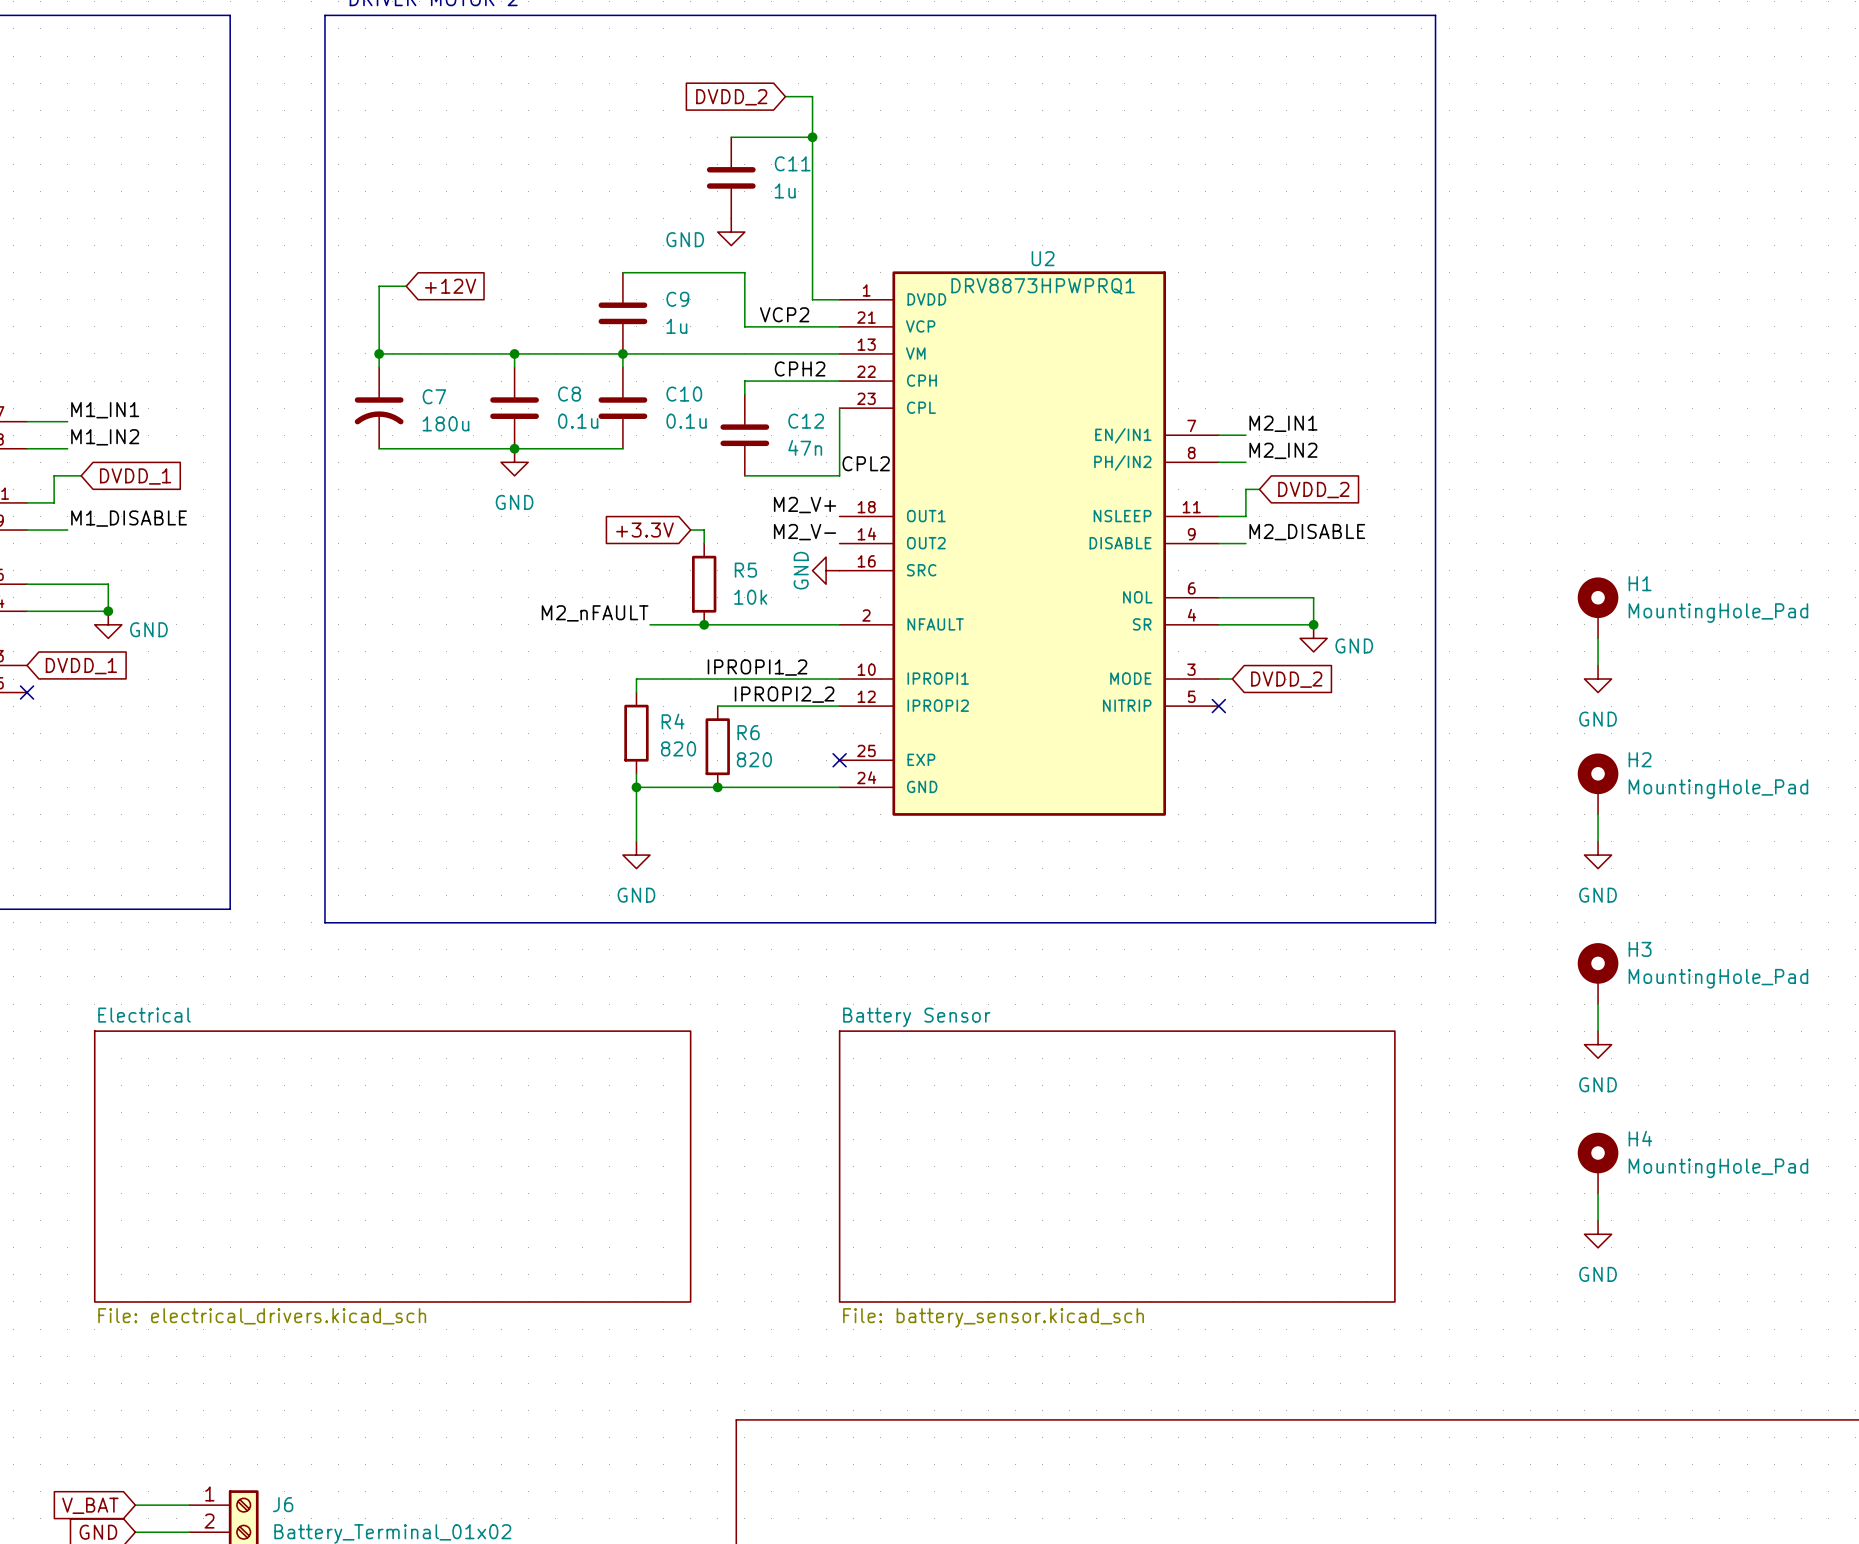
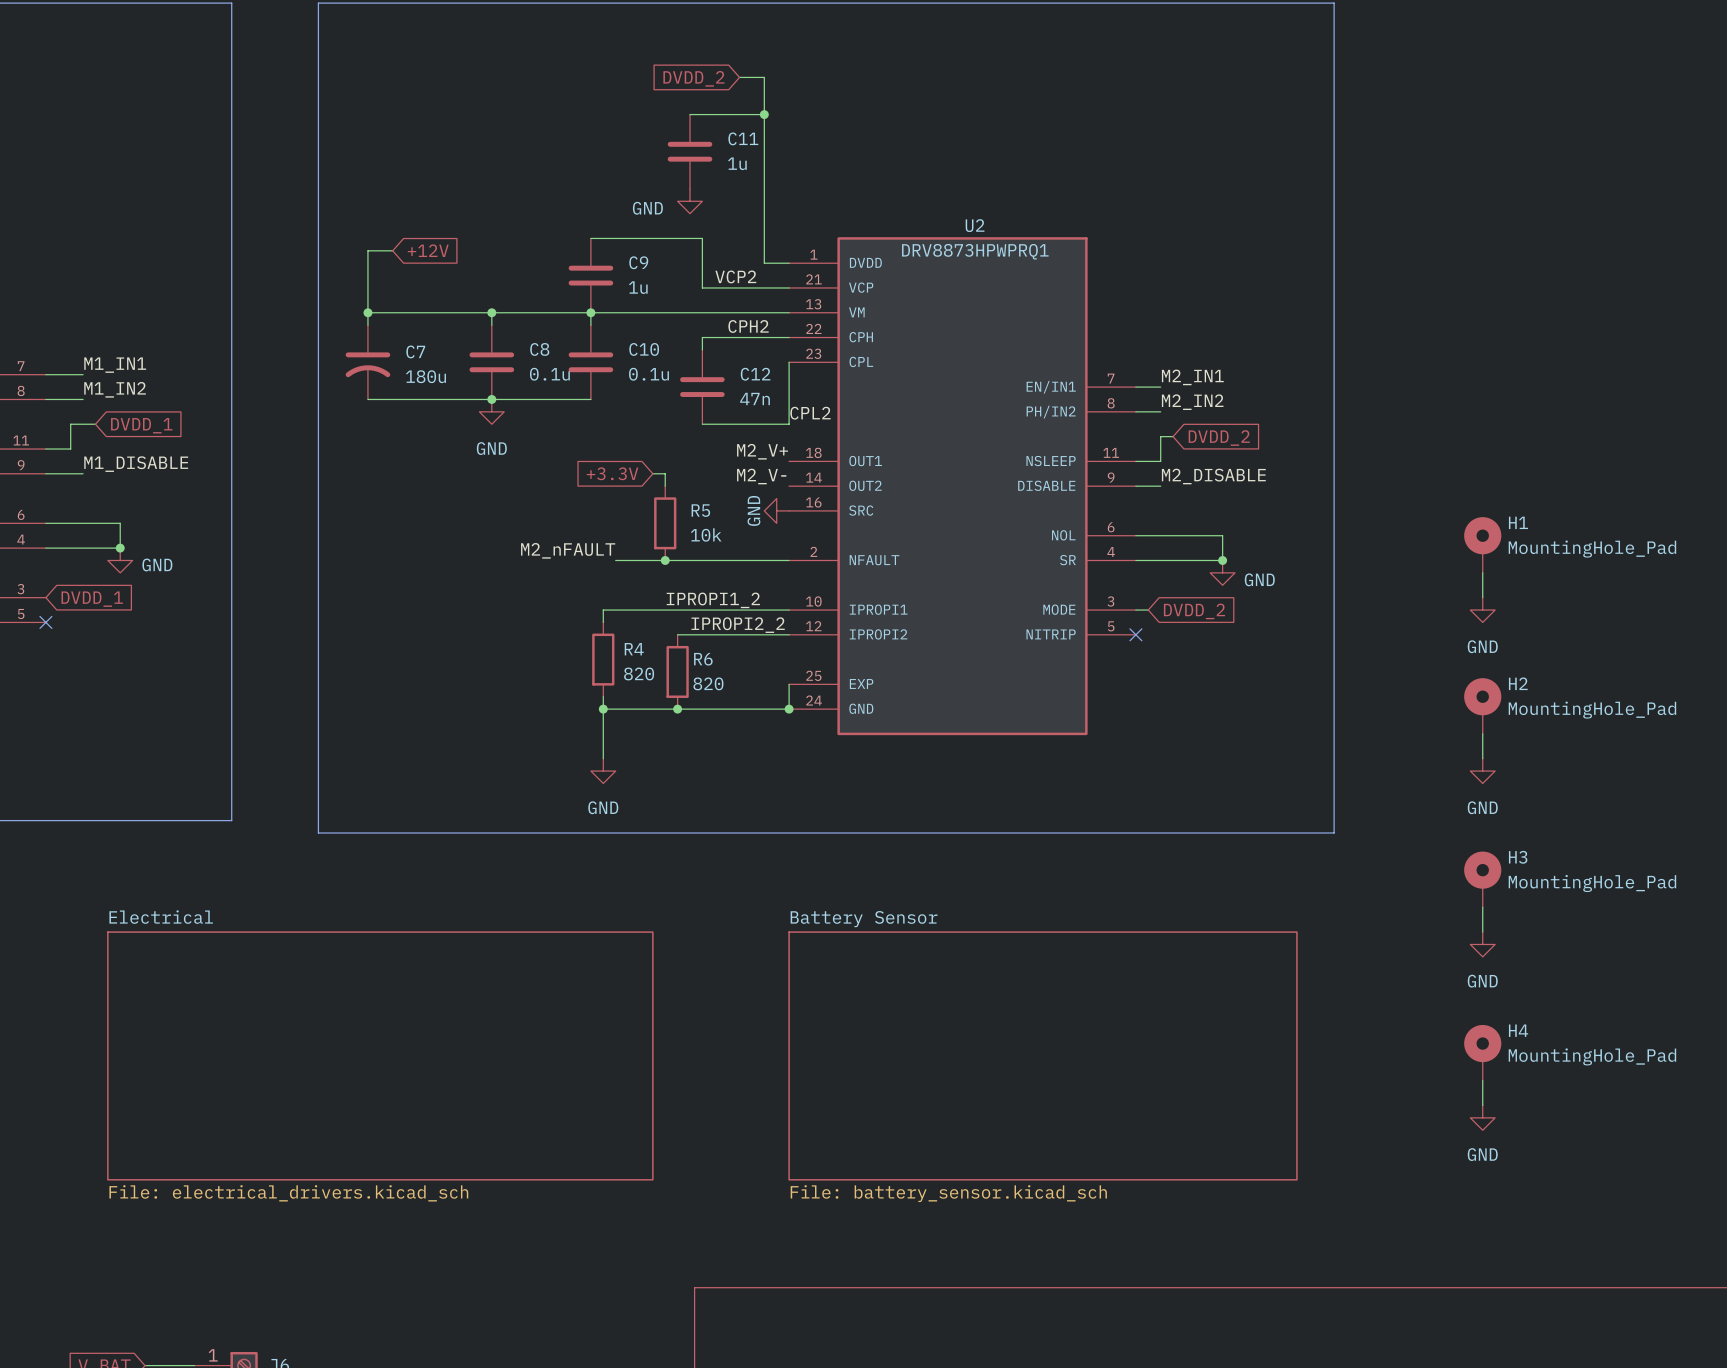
wire: none -> (789, 684) (789, 709)
no-connect mark: (839, 760) -> none
junction: none -> (789, 709)

